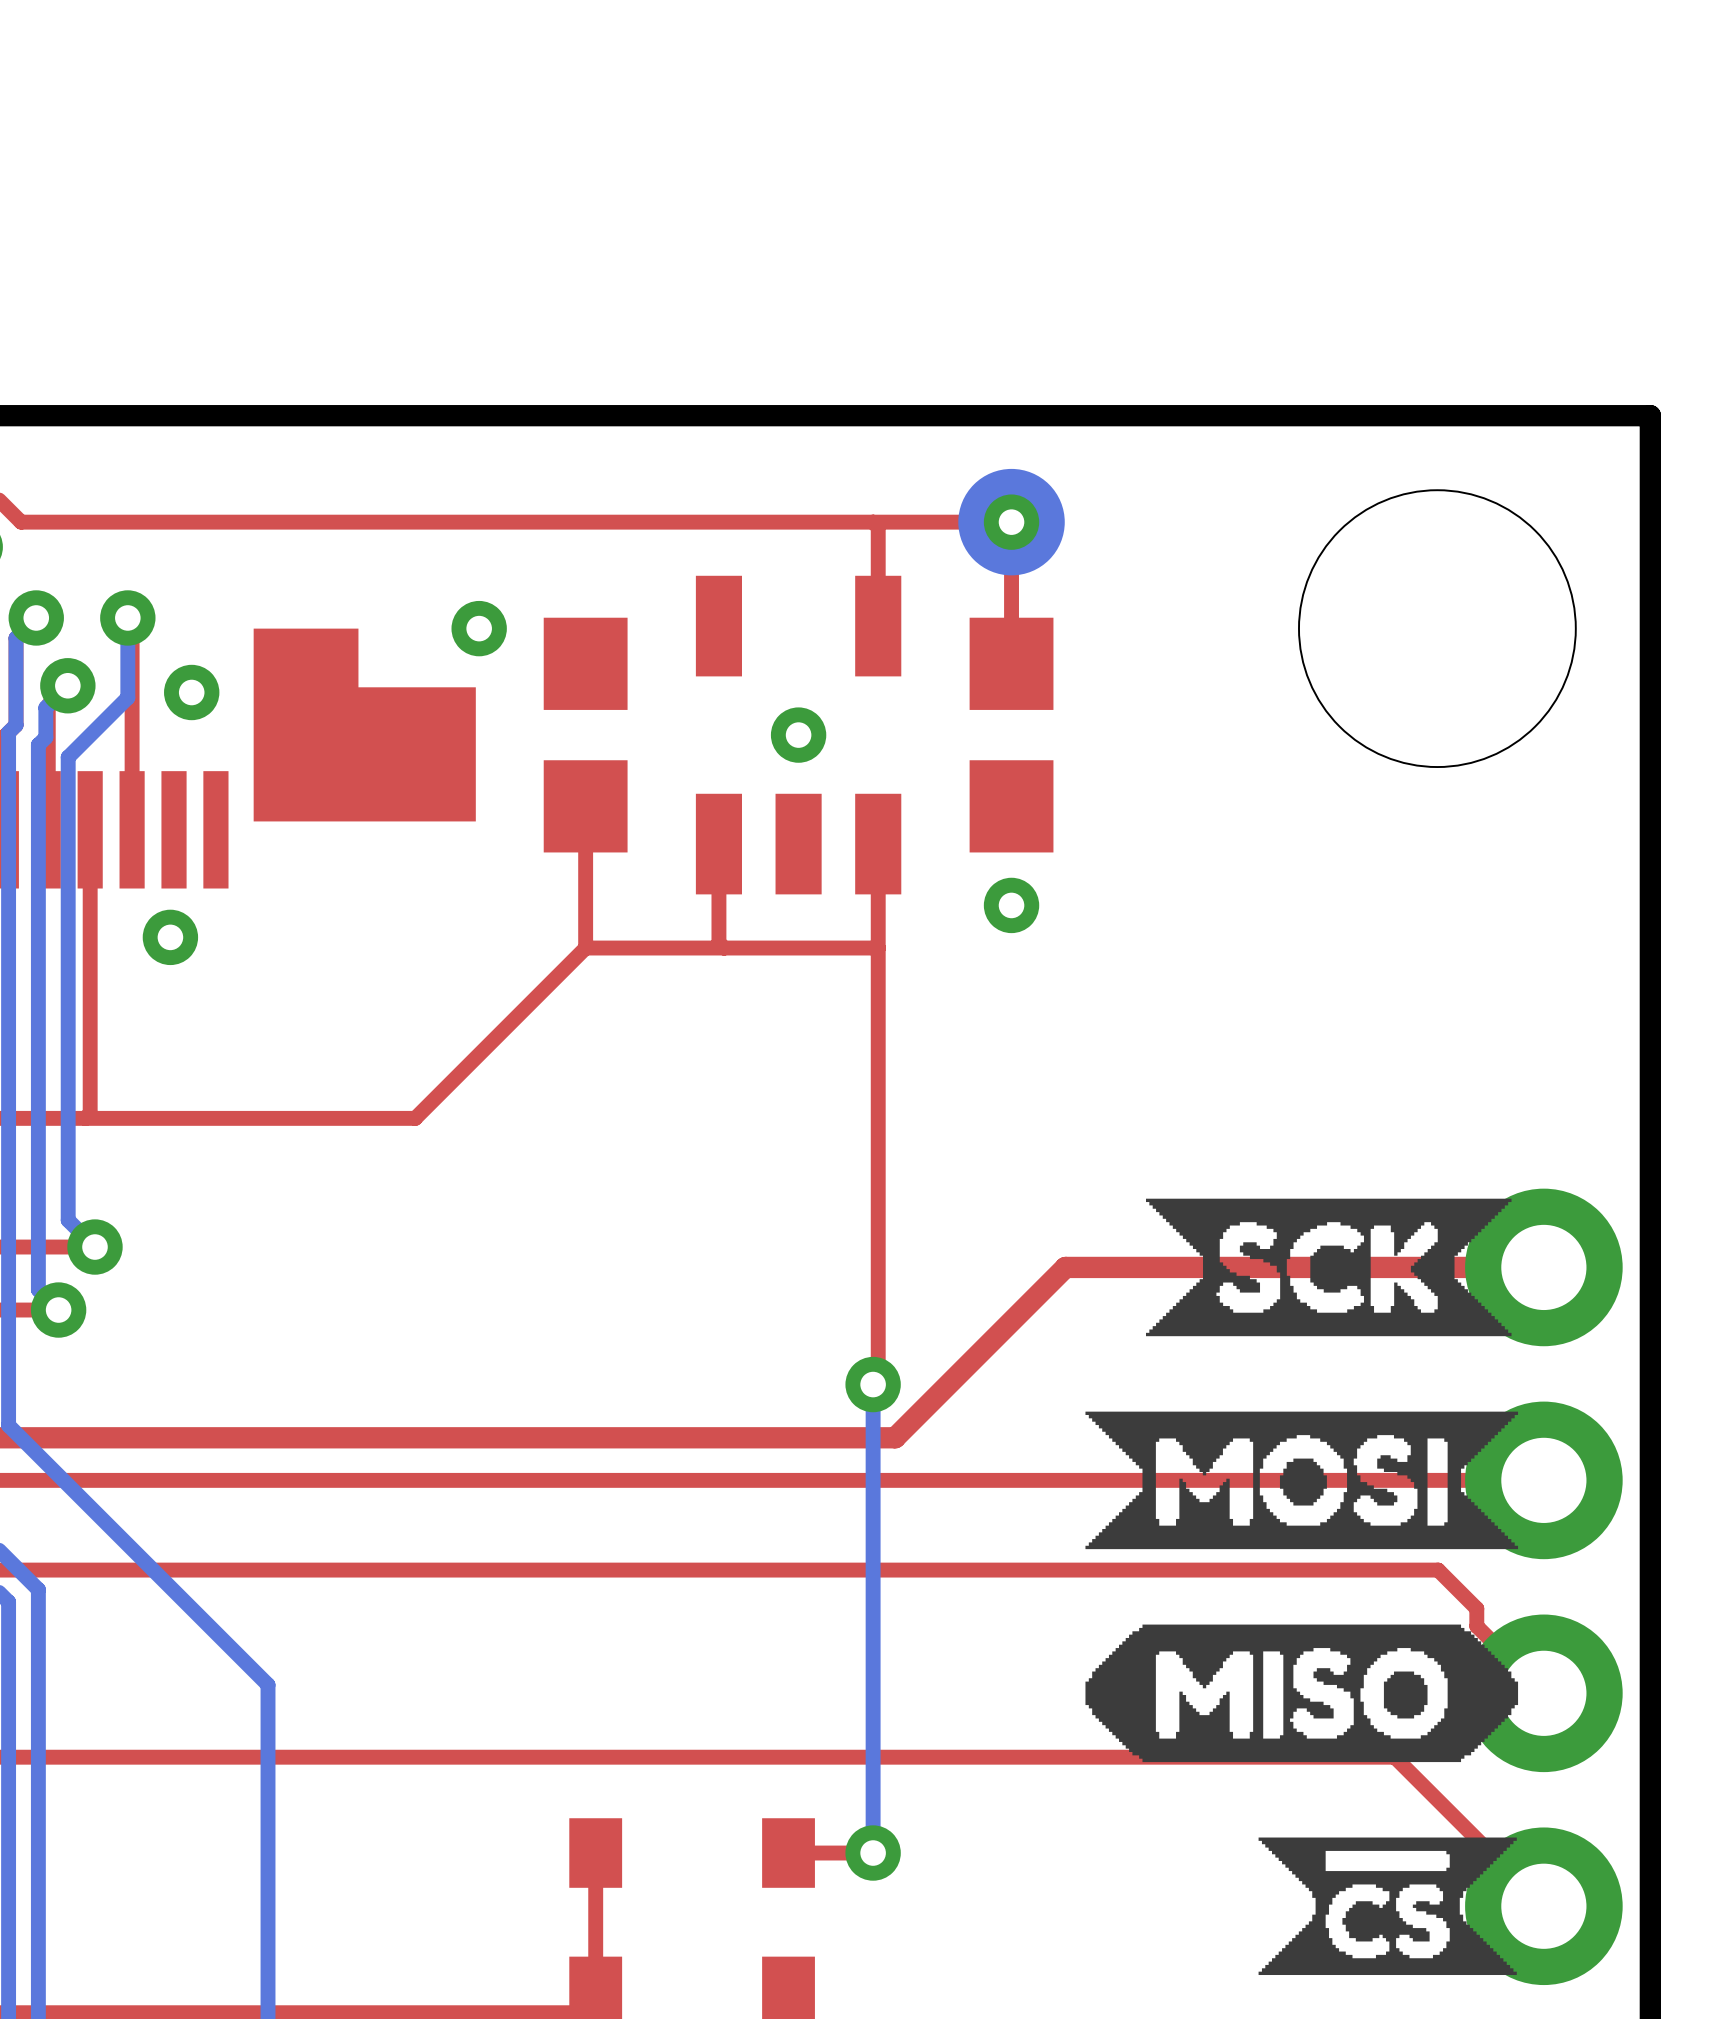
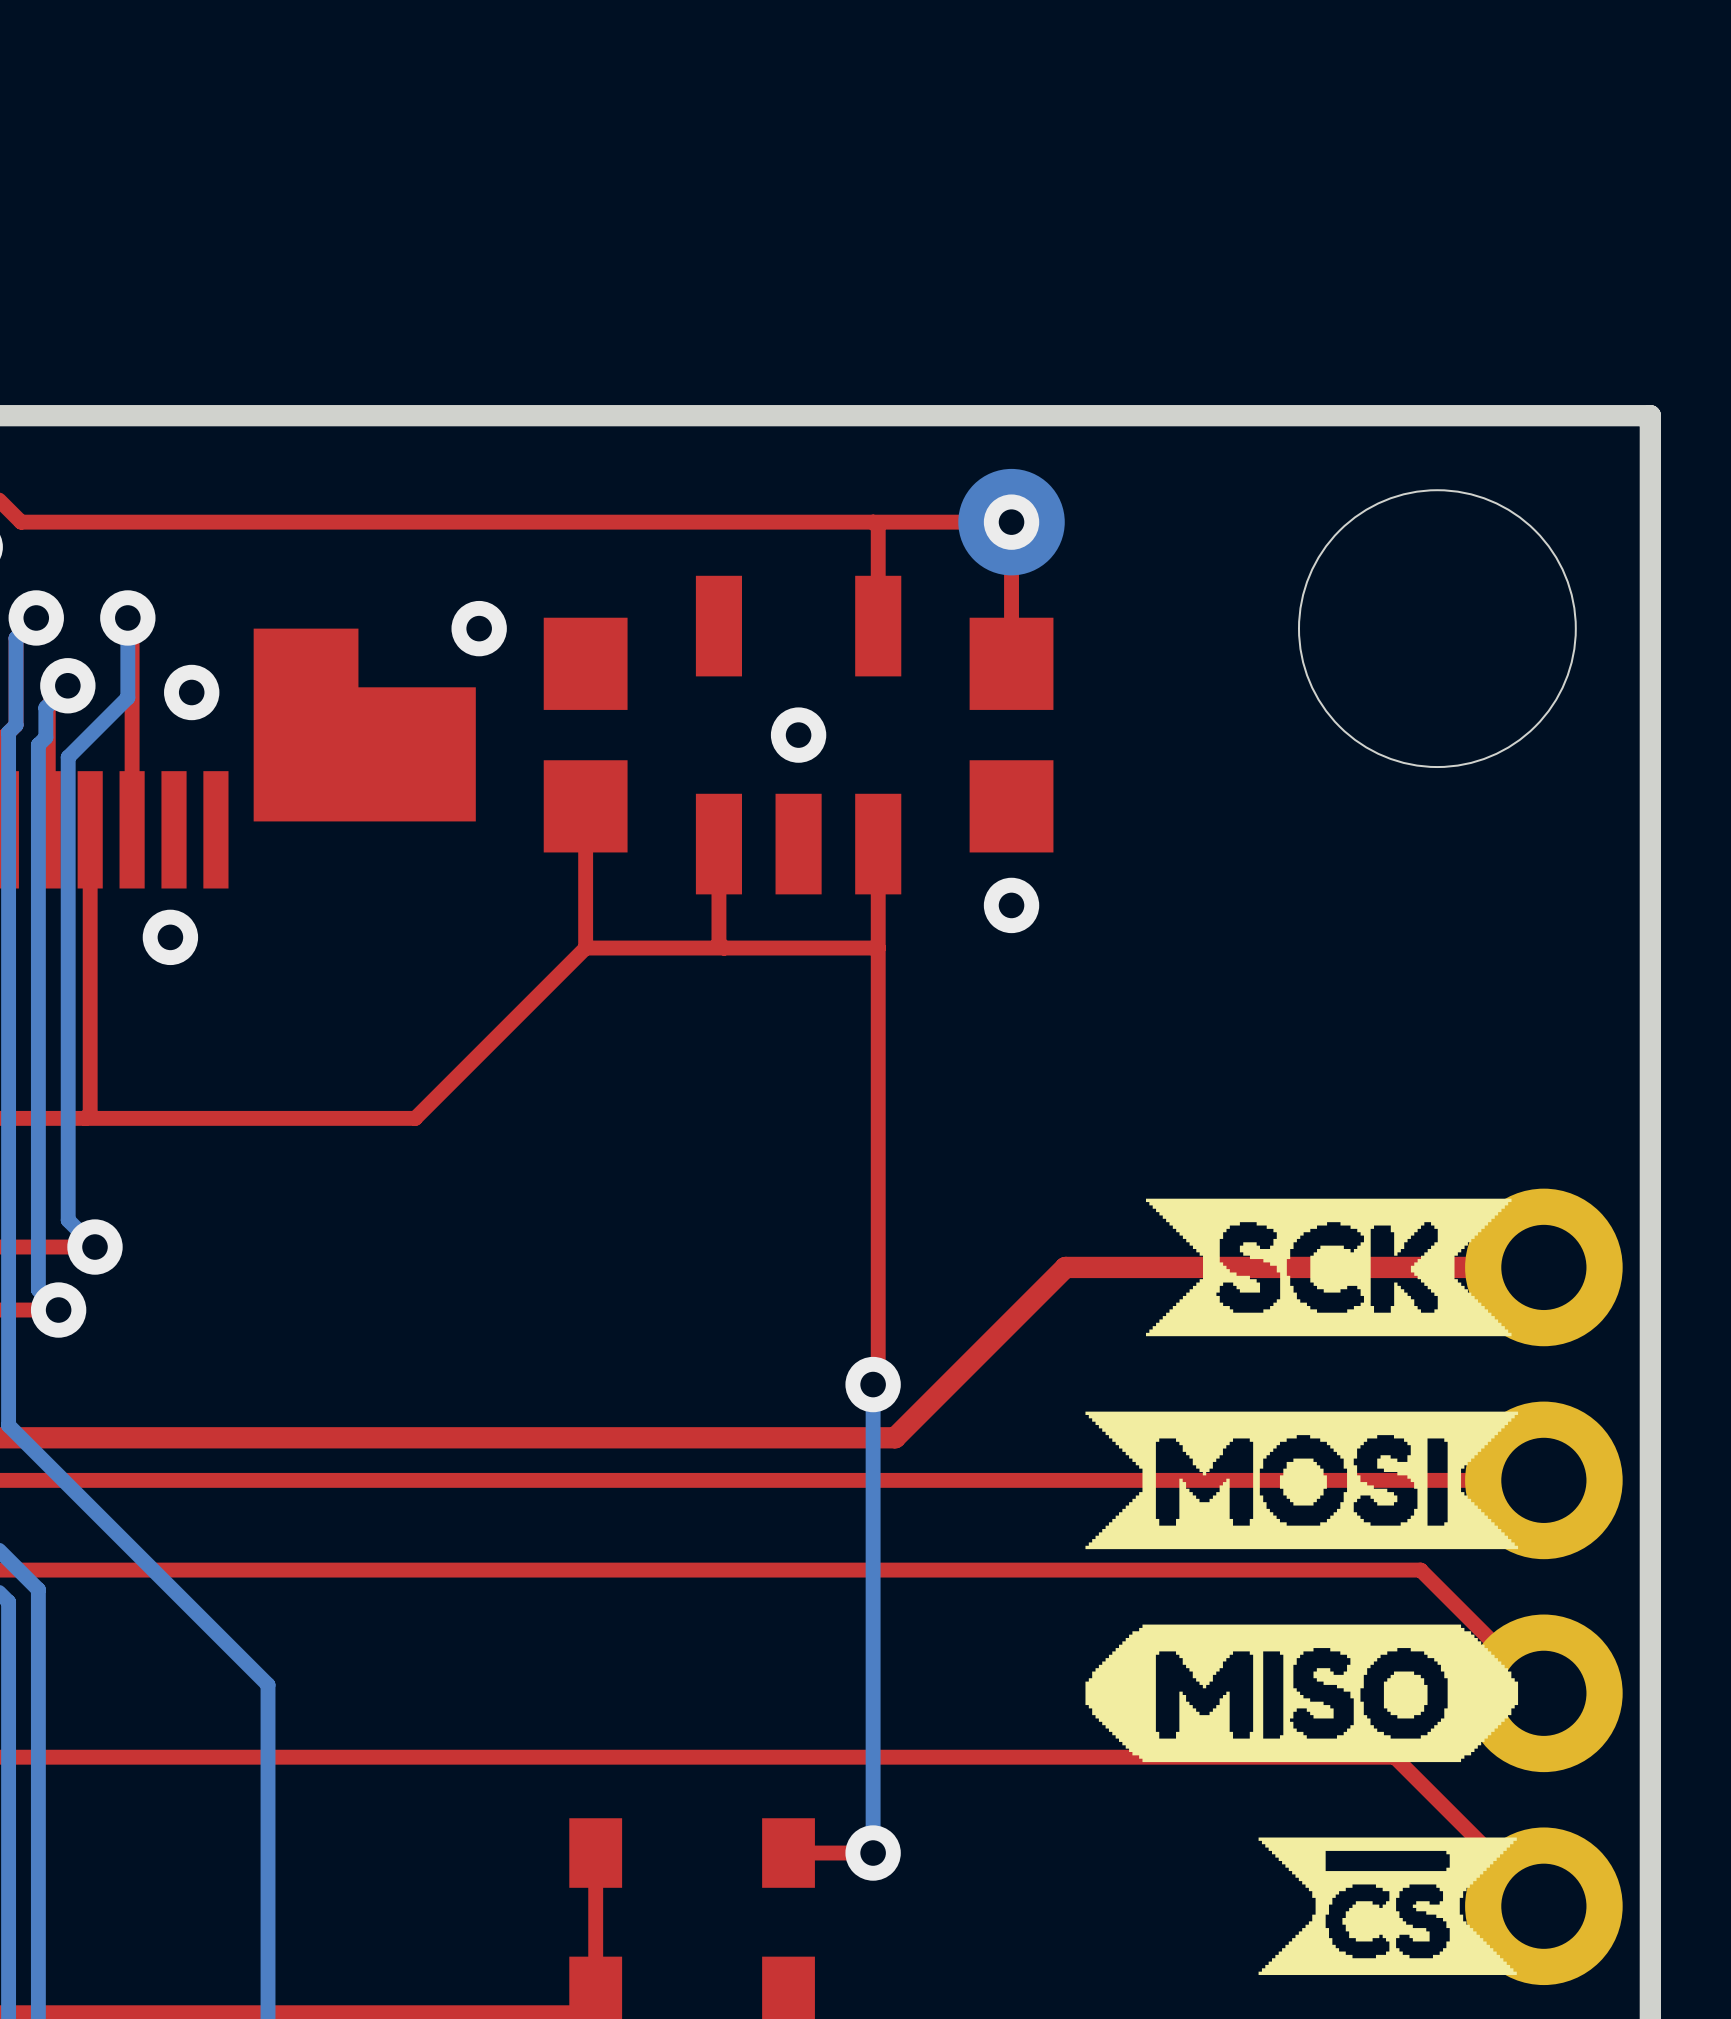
top track: (1420, 1570) (1438, 1570) (1476, 1608) (1476, 1626) -> (1420, 1570) (1476, 1626)

